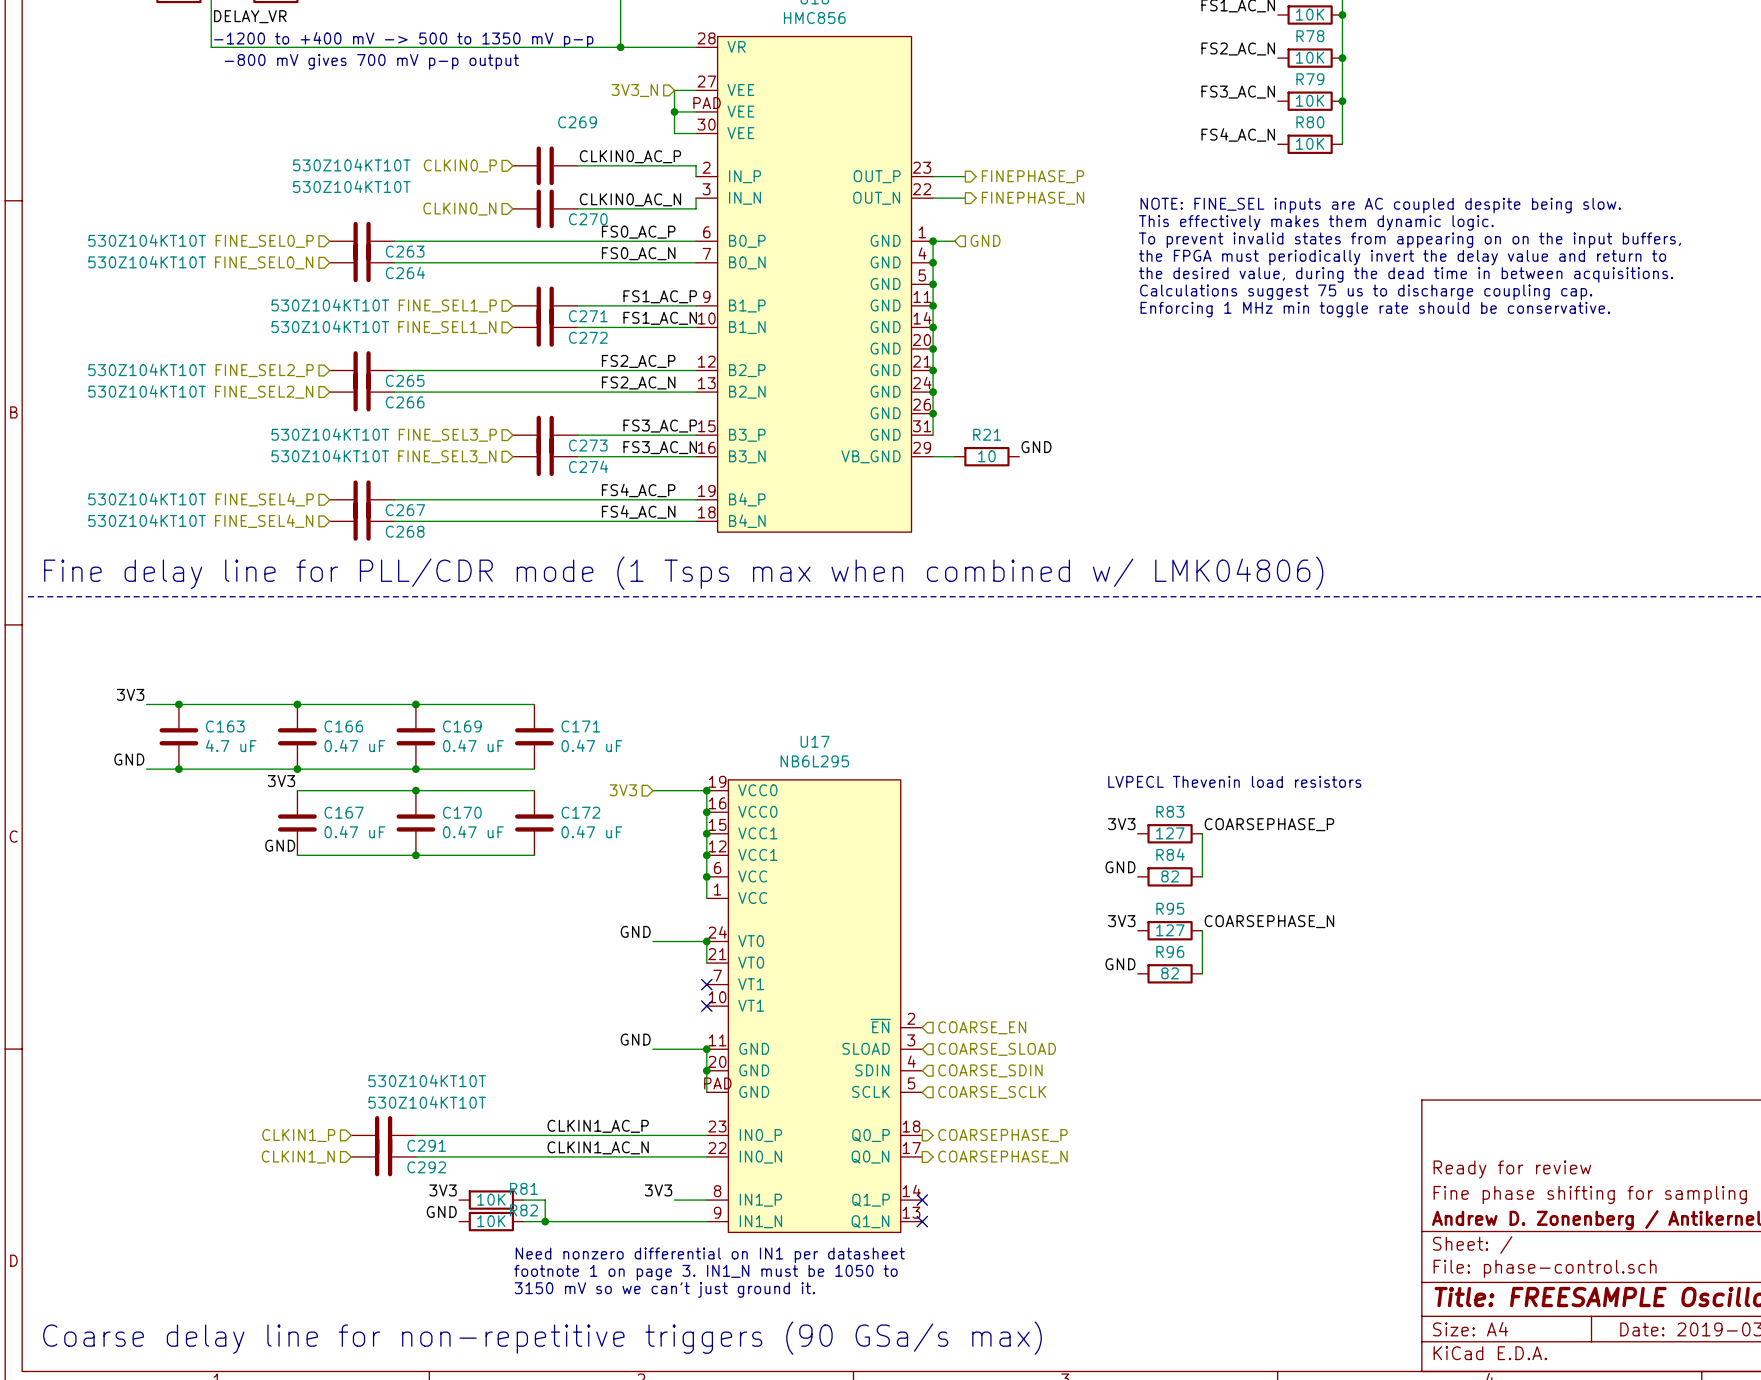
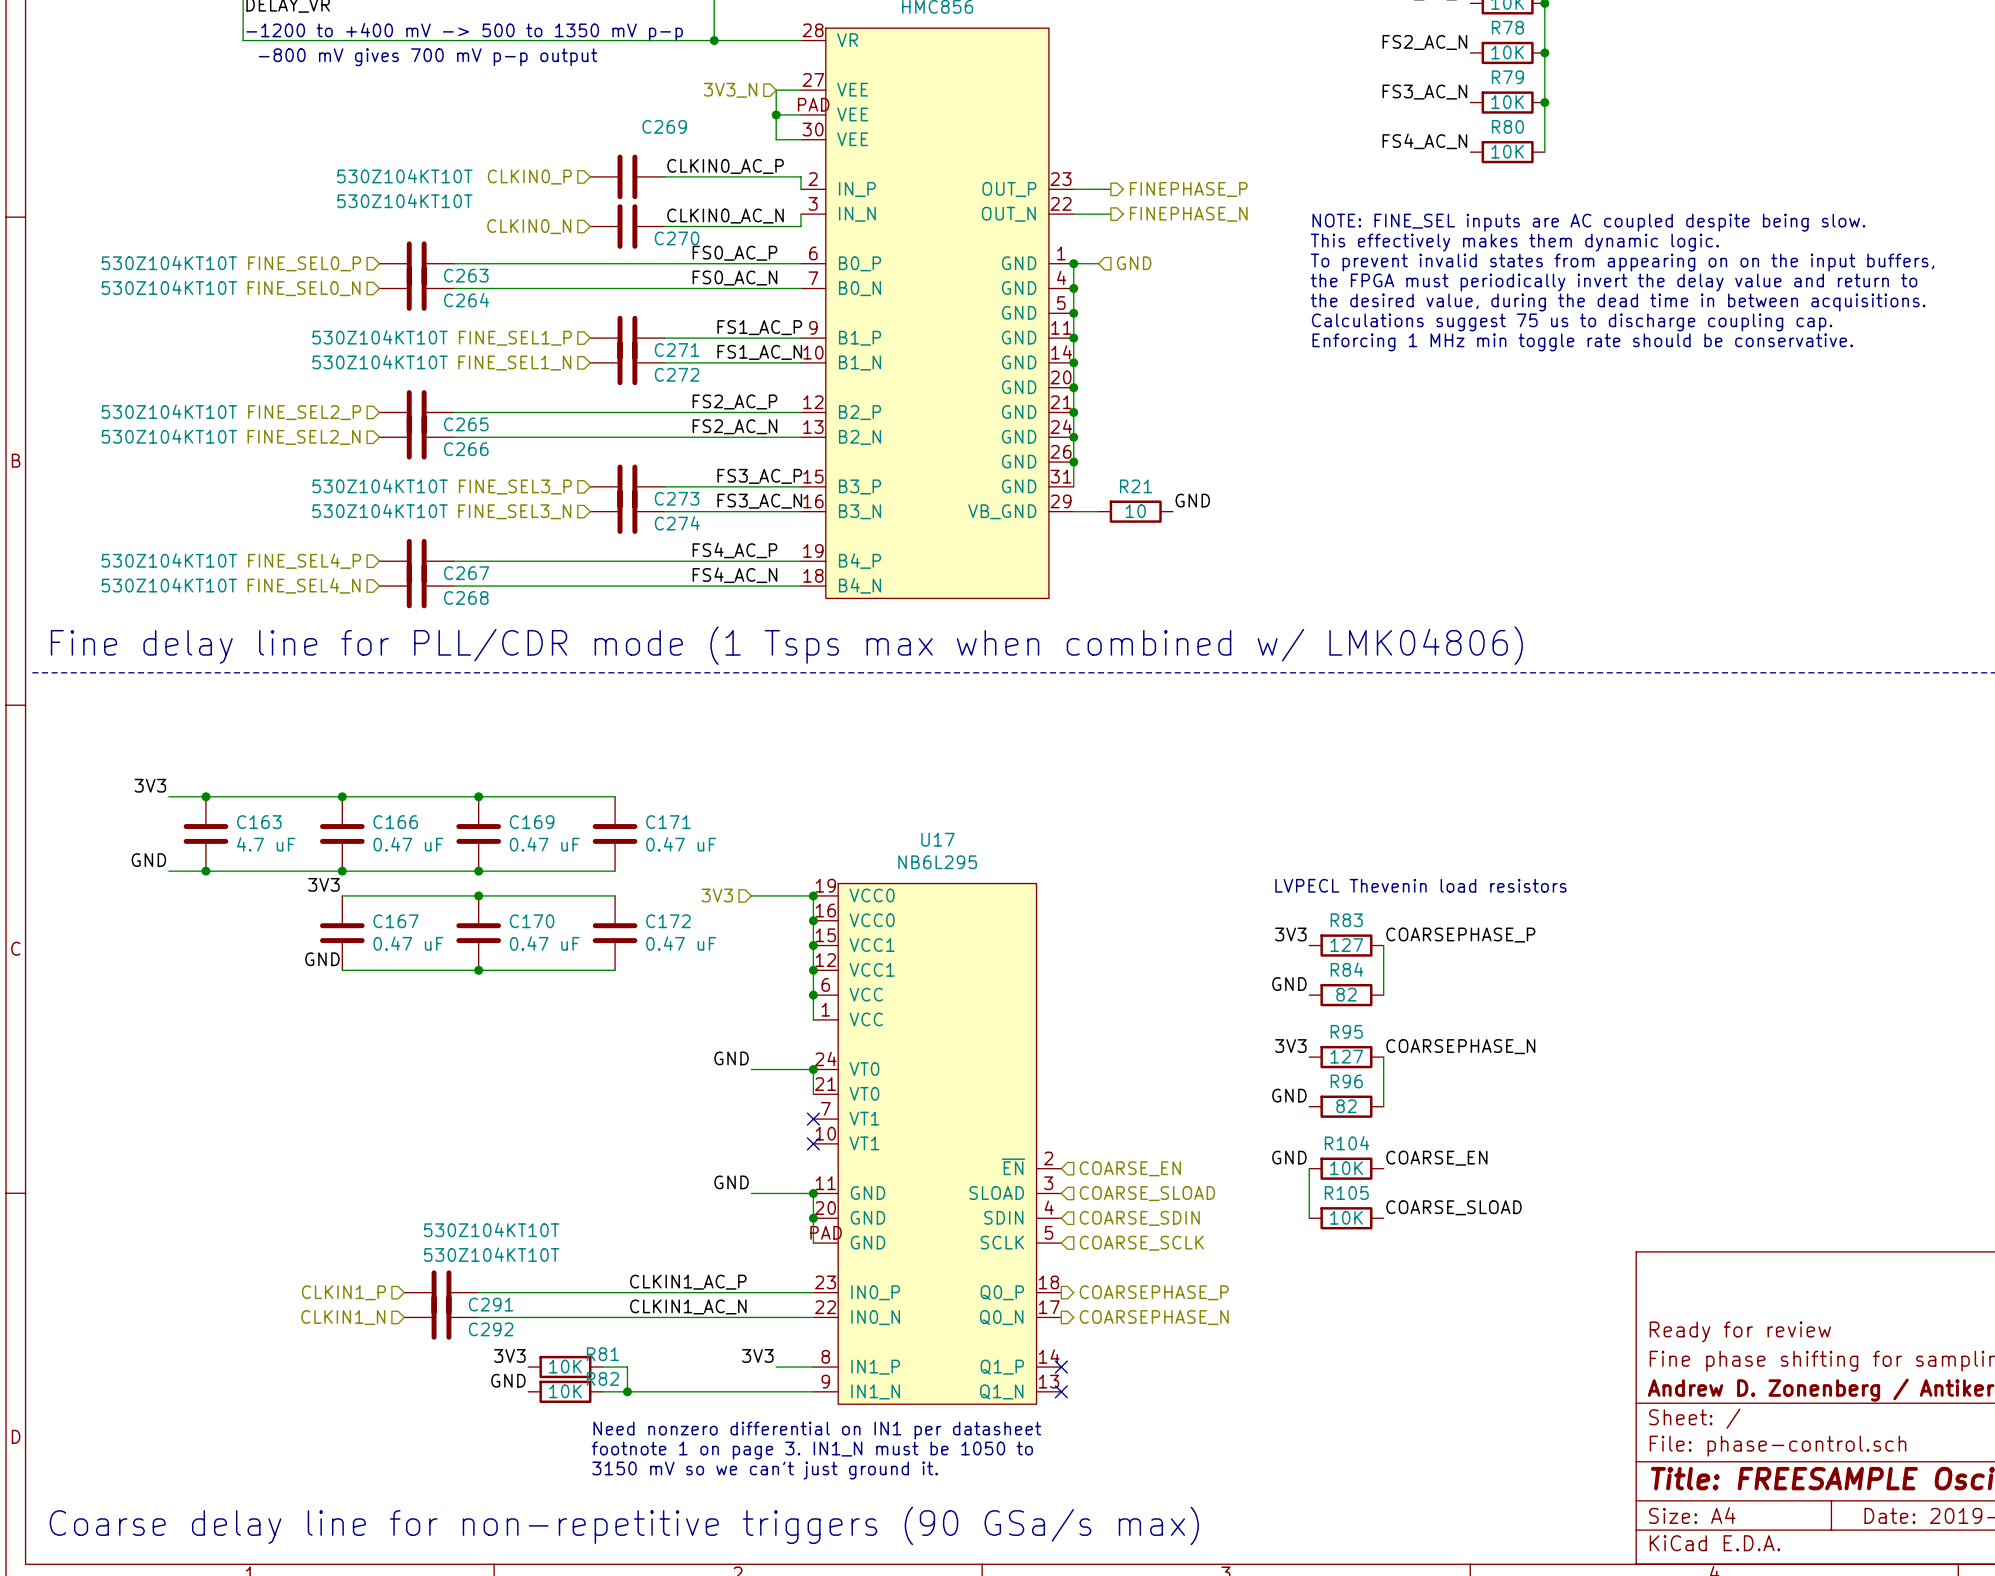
label: none -> GND (1289, 1157)
label: none -> COARSE_EN (1436, 1158)
wire: none -> (1309, 1168) (1309, 1218)
R104: none -> 10K (1346, 1168)
label: none -> COARSE_SLOAD (1454, 1207)
R105: none -> 10K (1346, 1218)

